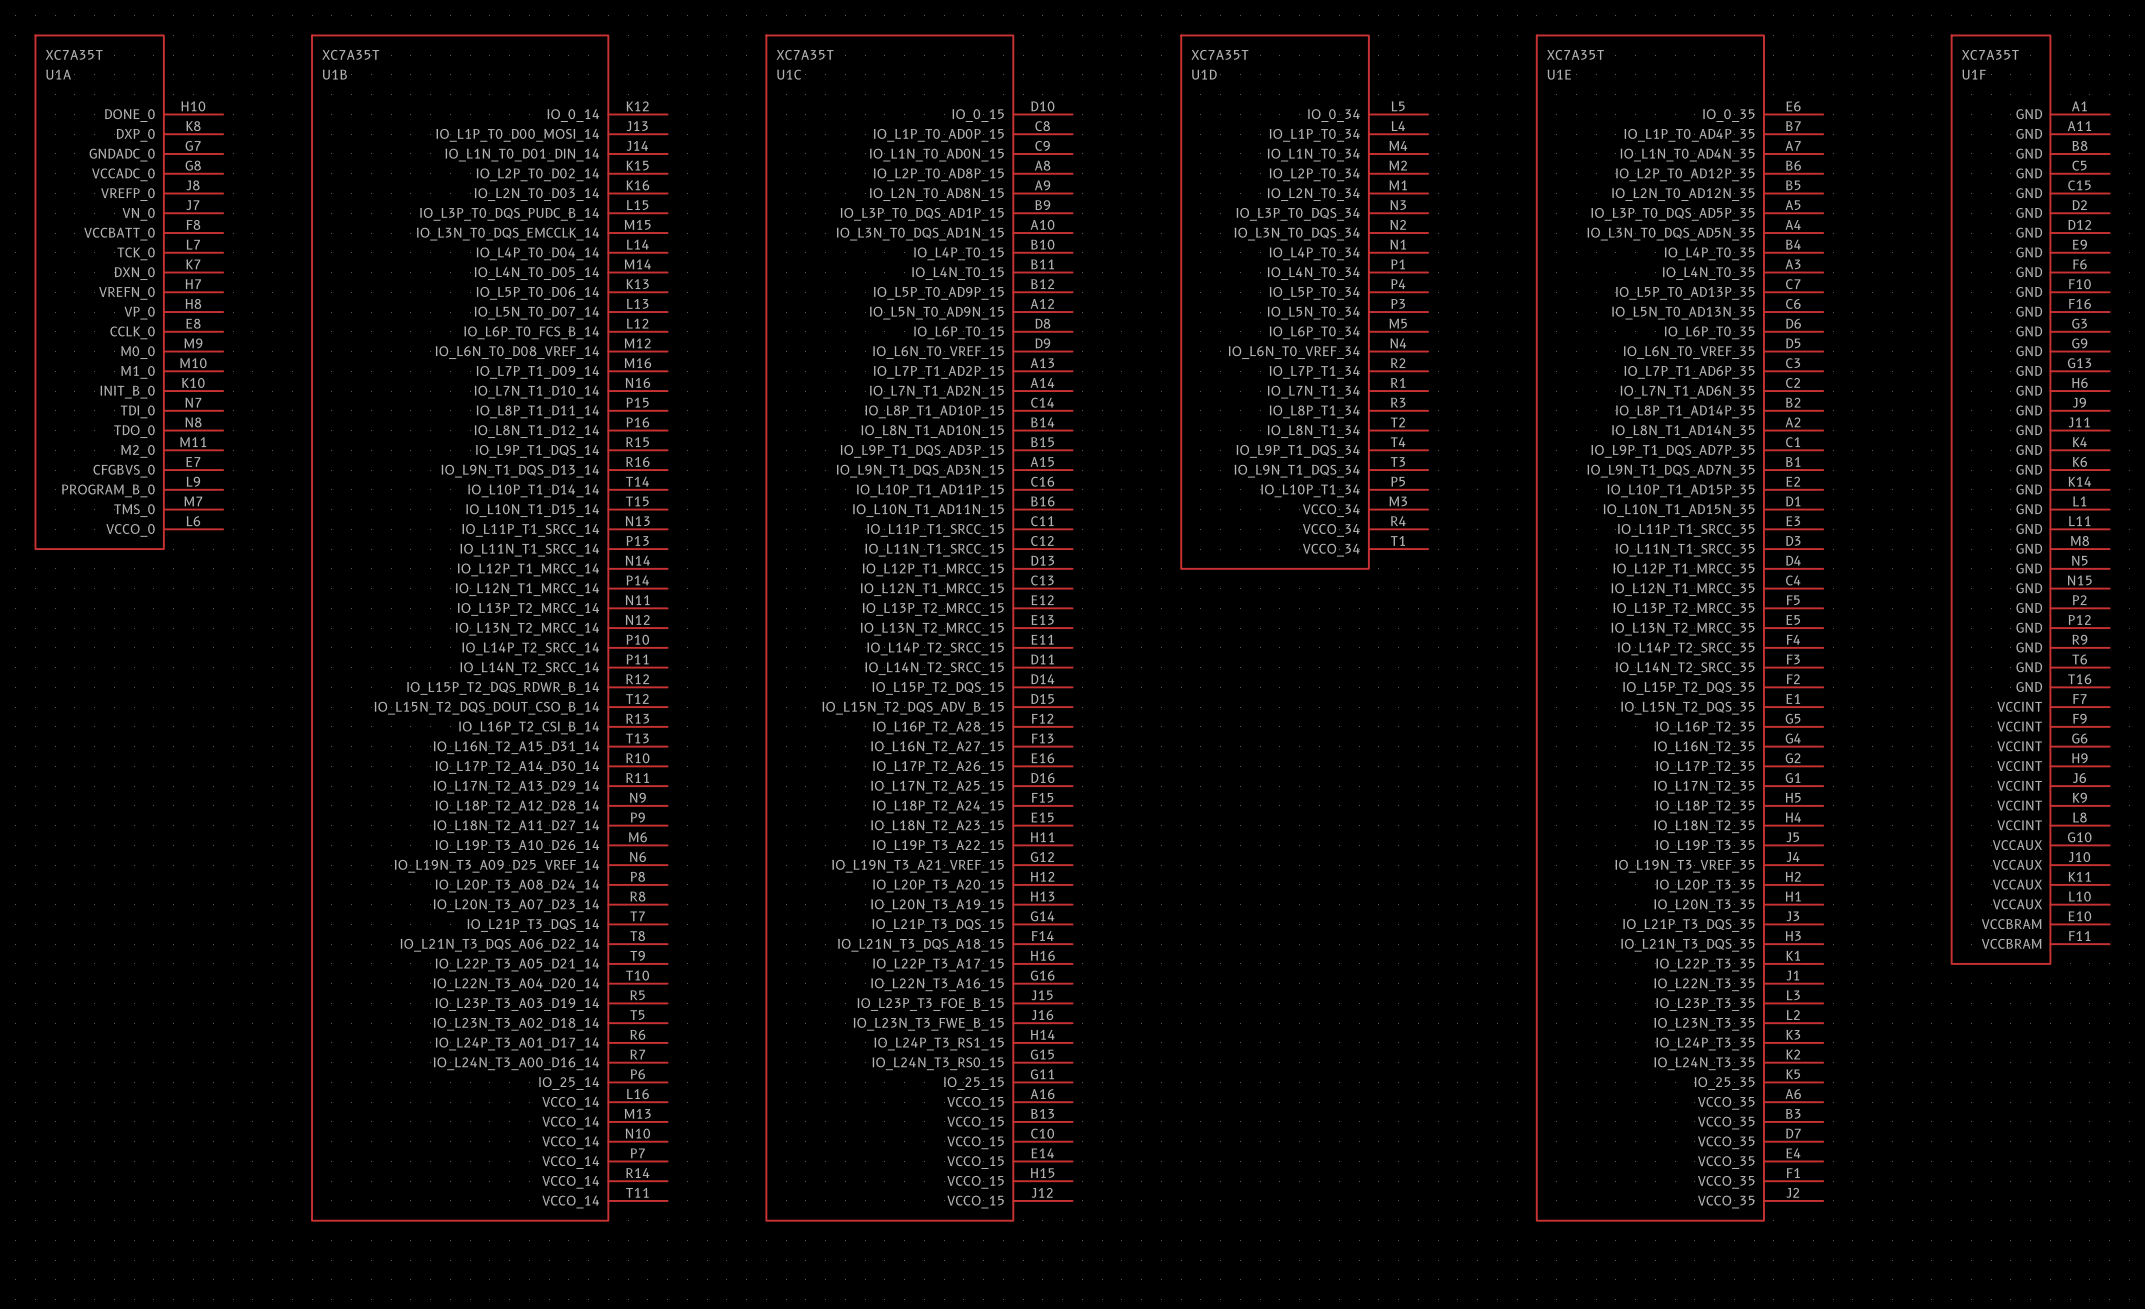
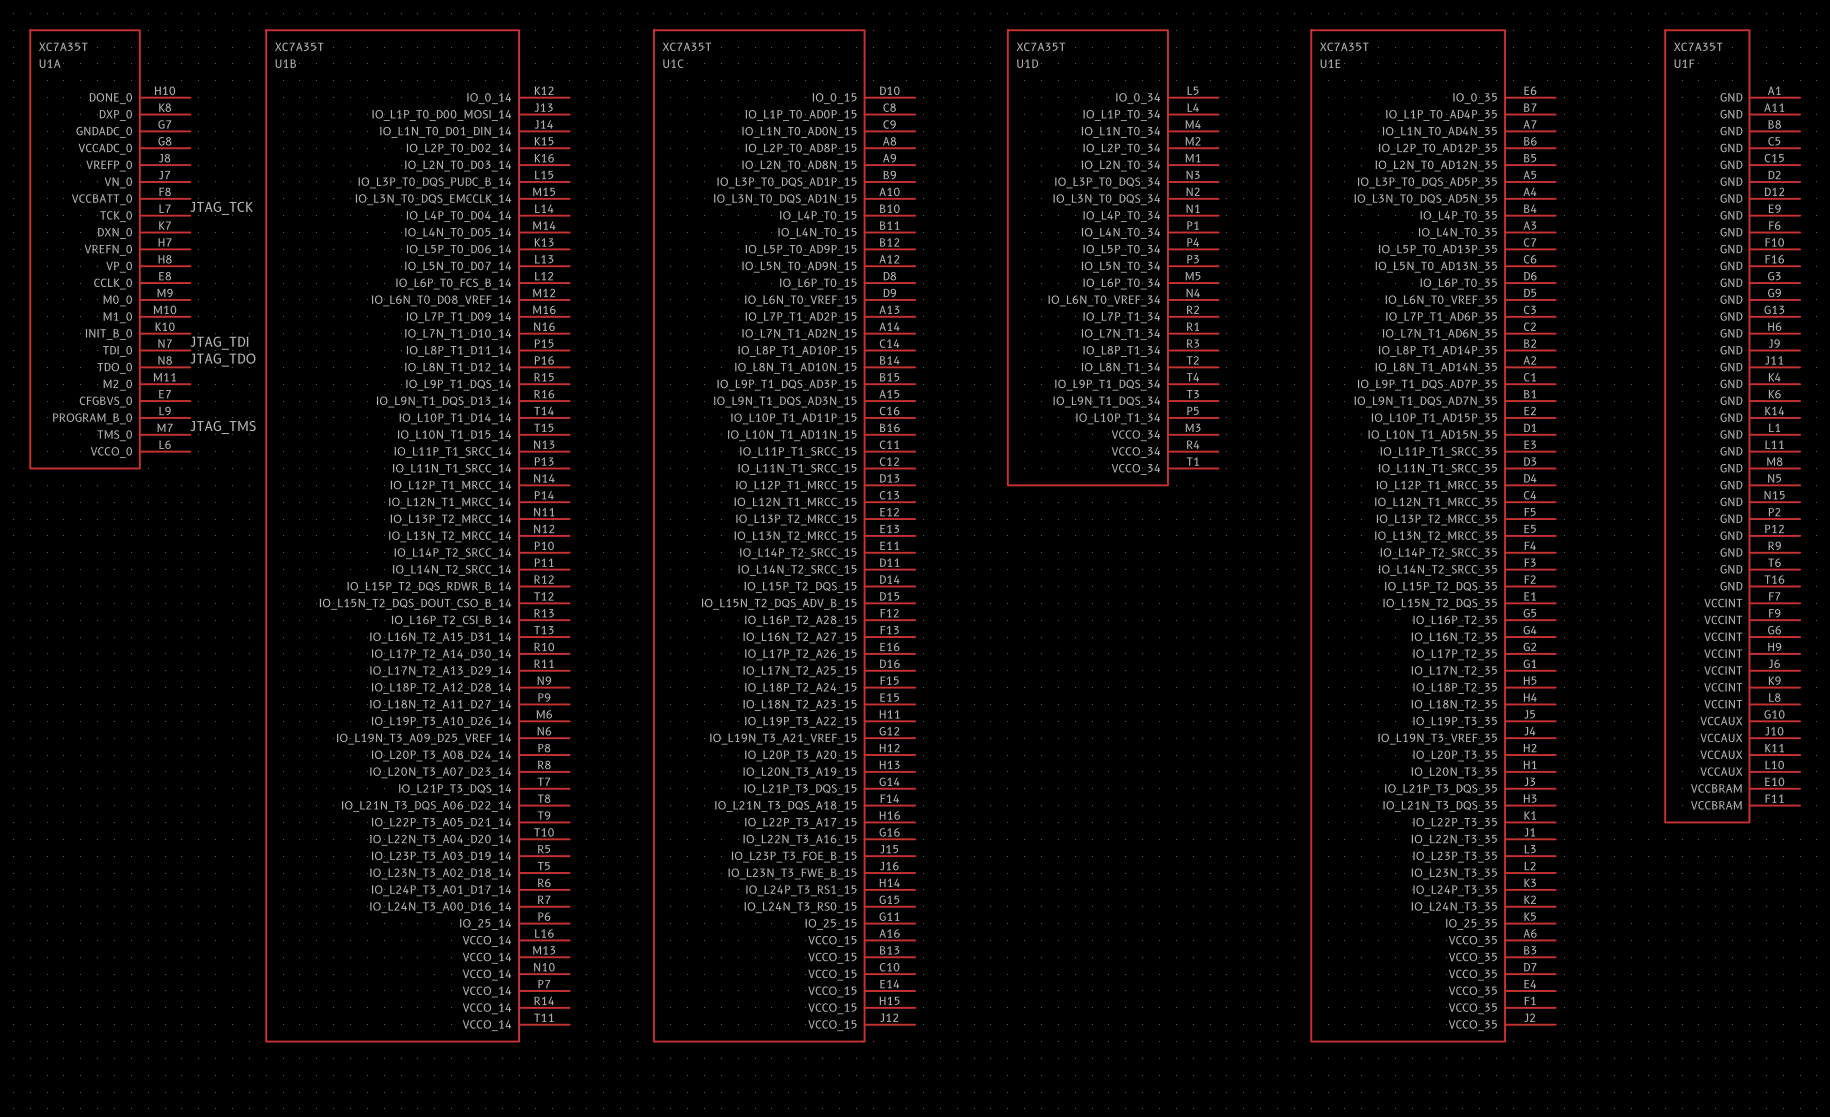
label: none -> JTAG_TCK (221, 208)
label: none -> JTAG_TDI (219, 343)
label: none -> JTAG_TDO (222, 360)
label: none -> JTAG_TMS (223, 427)

